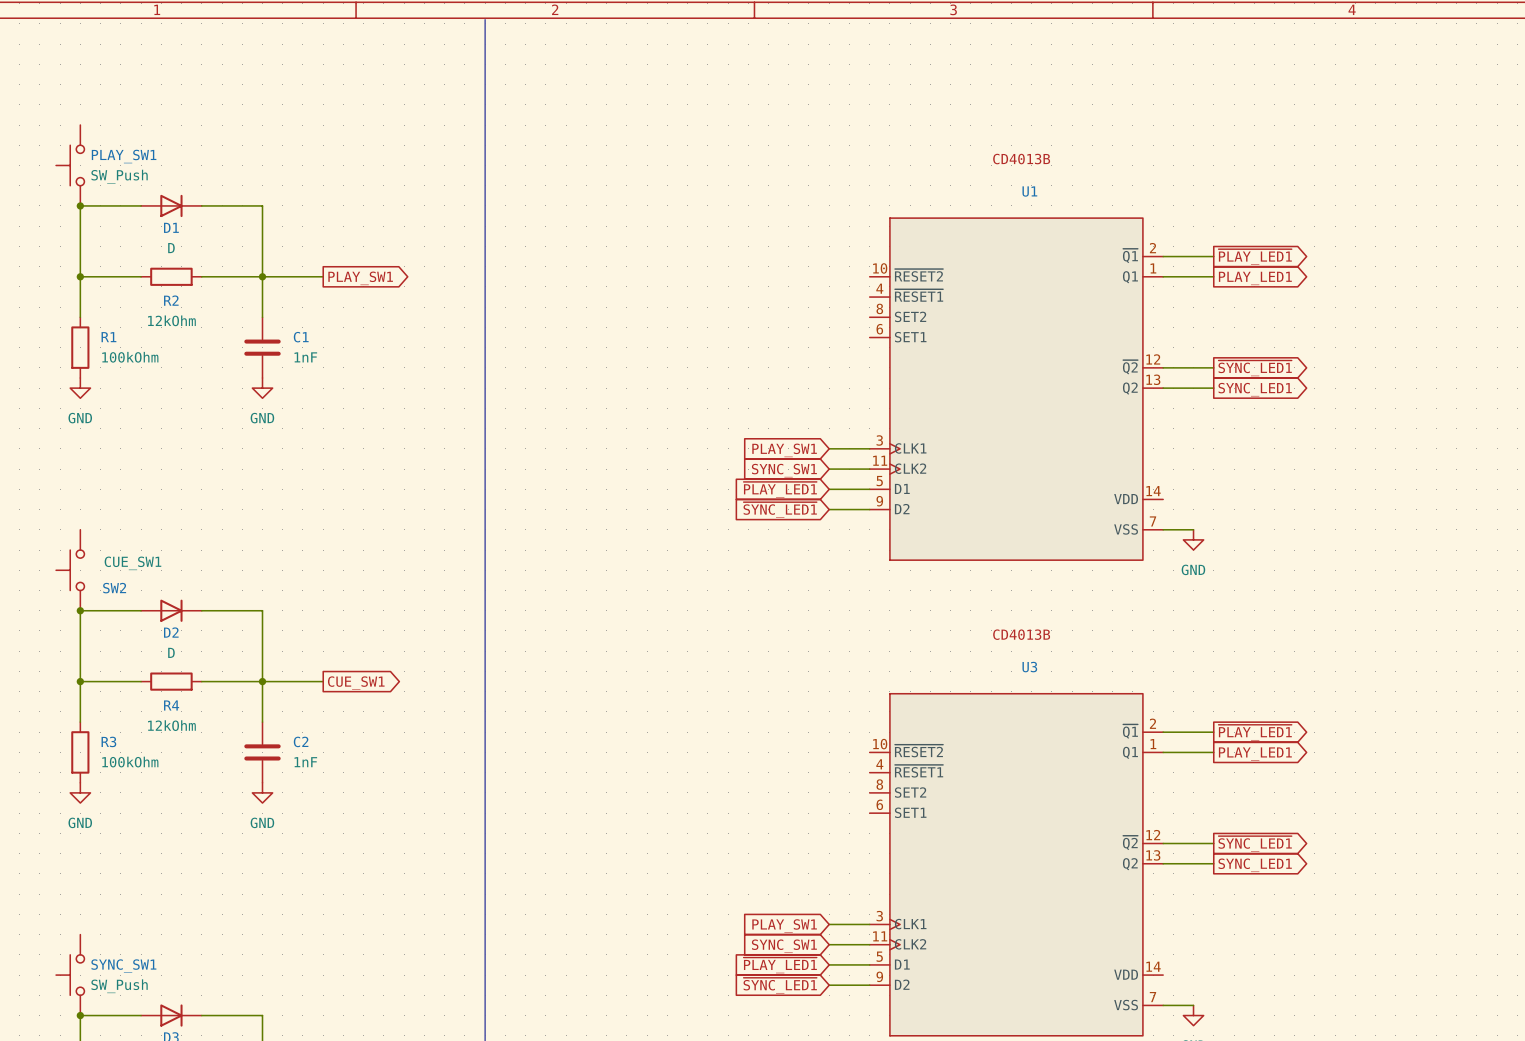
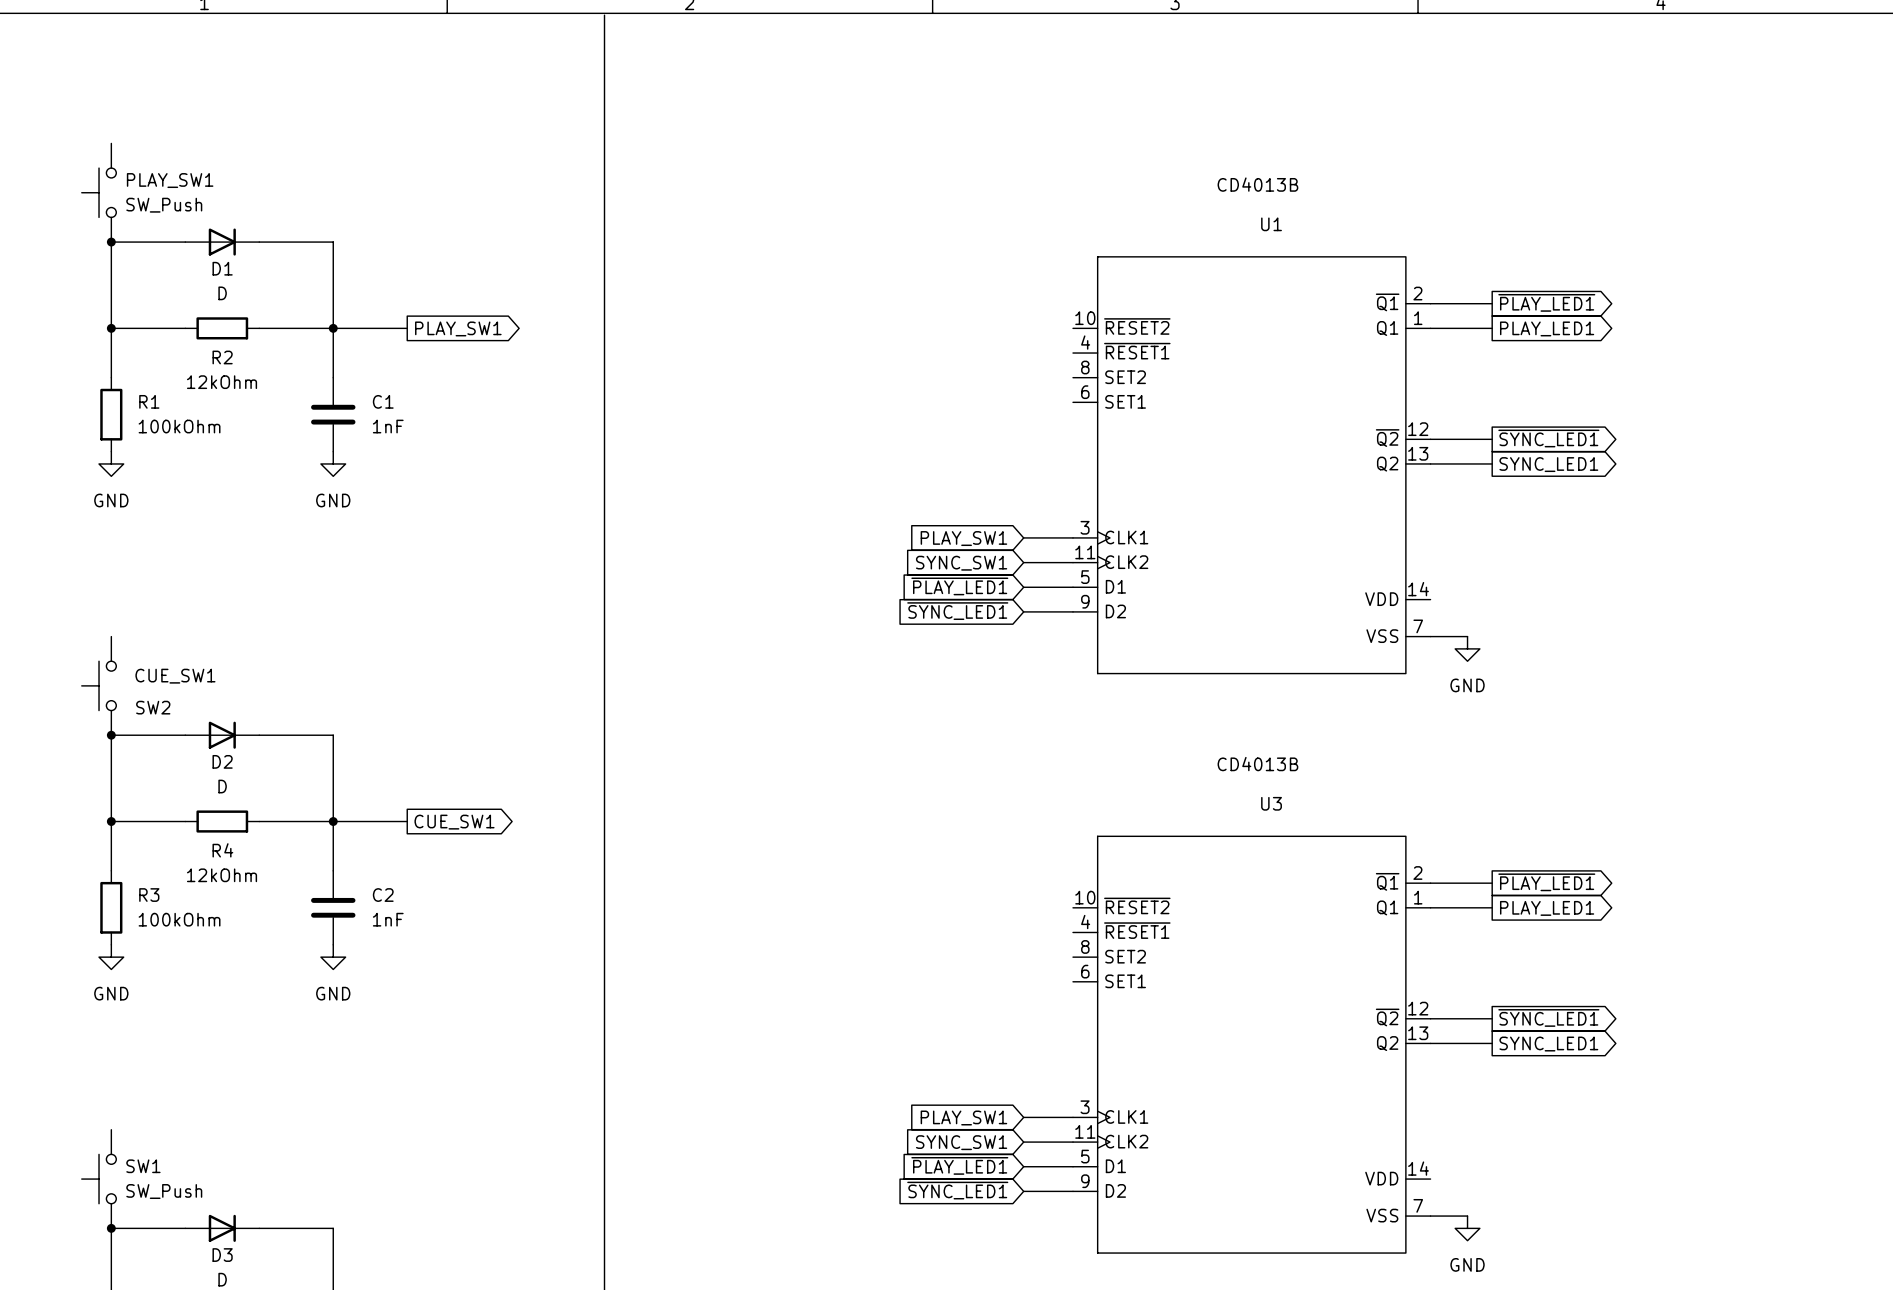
SYNC_SW1 name: SYNC_SW1 (123, 966) -> SW1 (143, 1166)

